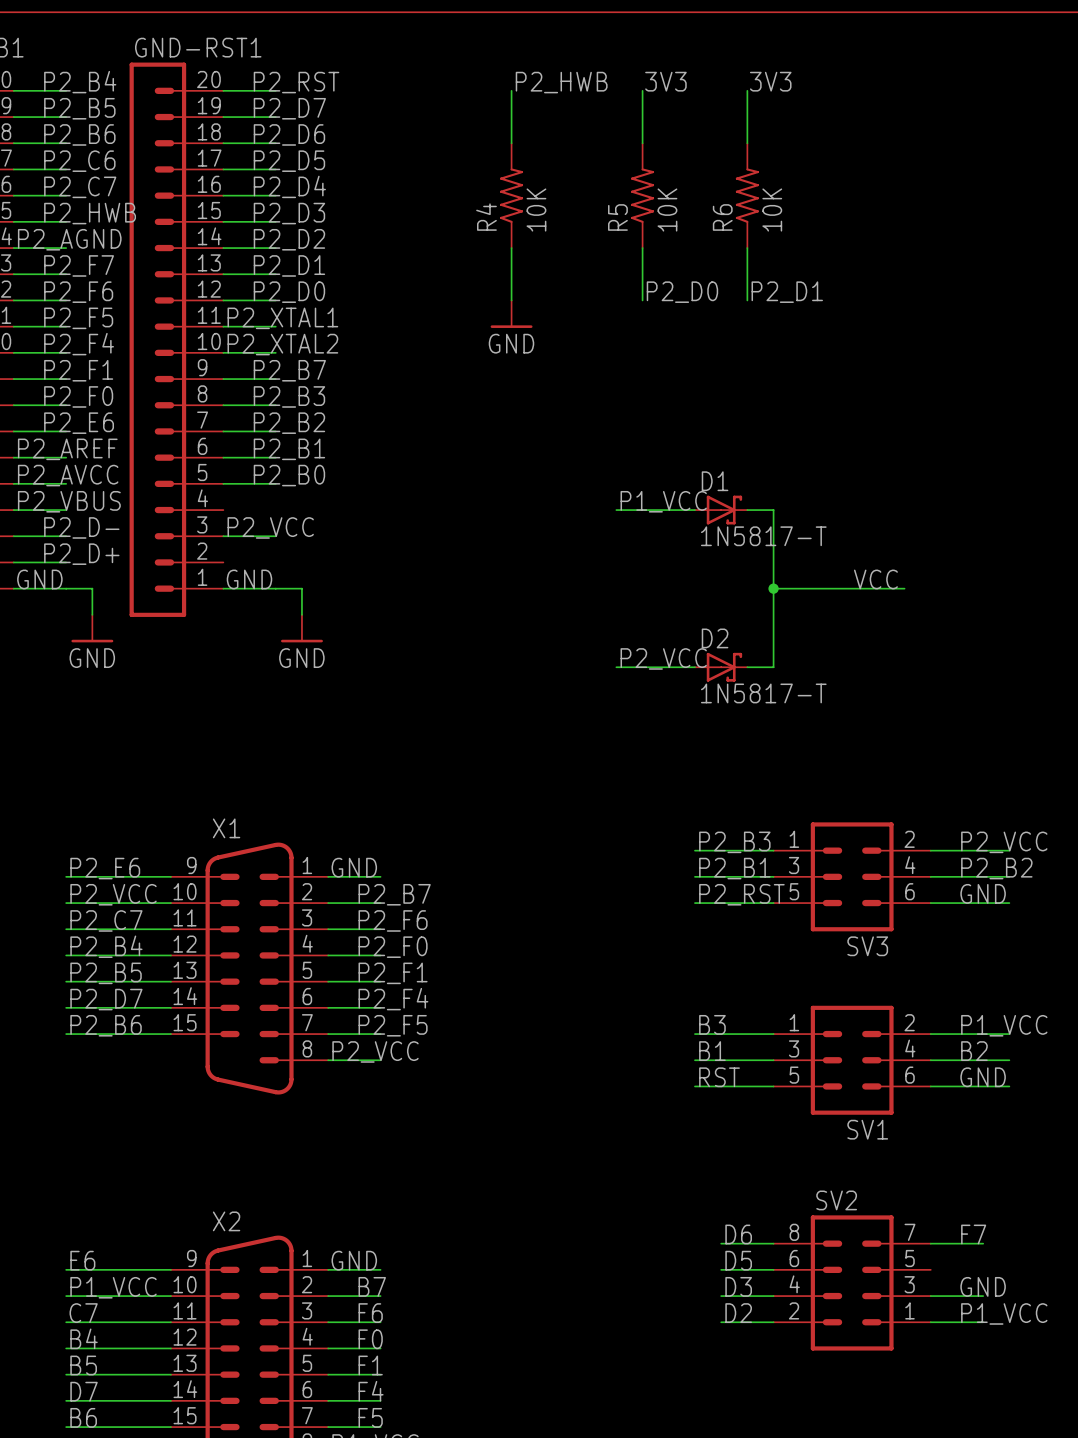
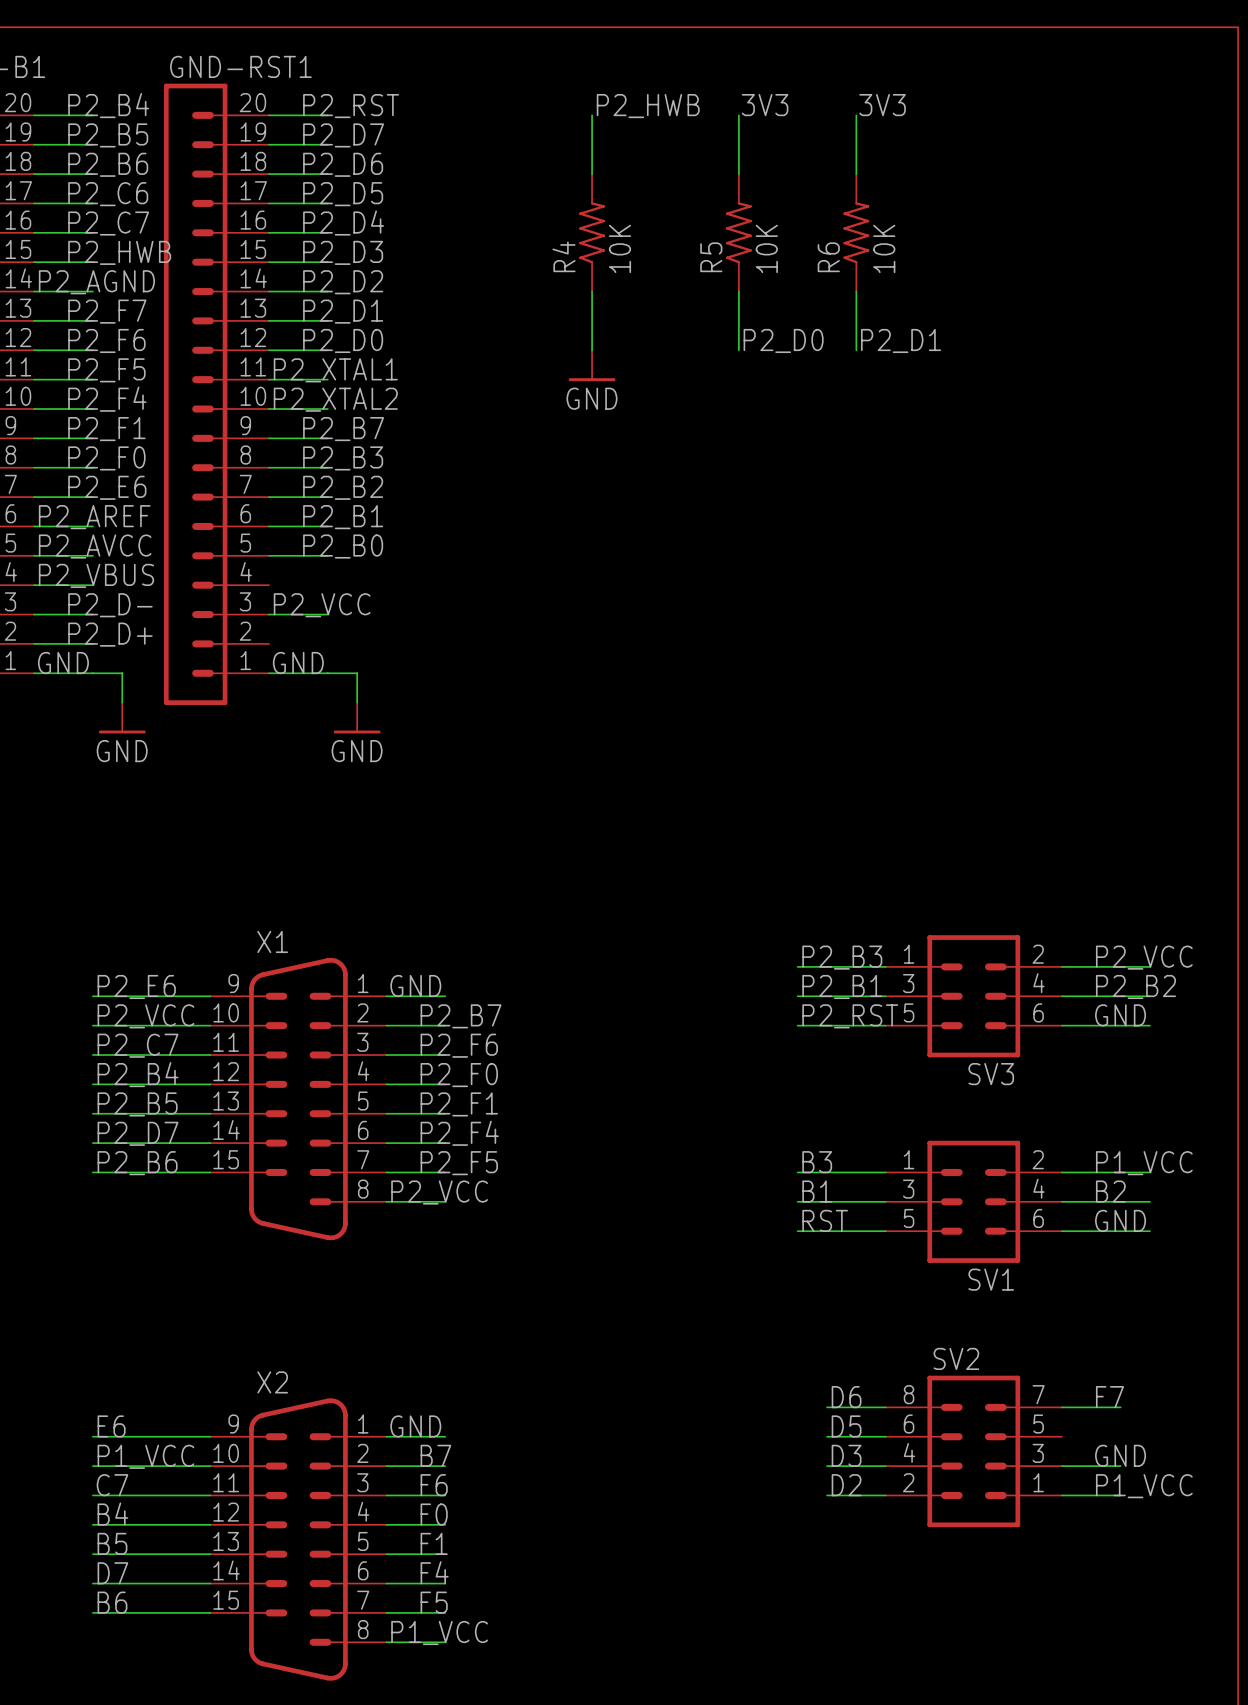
label: P1_VCC (663, 501) -> none
wire: (616, 510) (694, 510) -> none
D1: 1N5817-T (721, 510) -> none
wire: (747, 510) (773, 510) (773, 667) (747, 667) -> none
label: VCC (875, 579) -> none
wire: (773, 588) (904, 588) -> none
junction: (773, 588) -> none
label: P2_VCC (663, 658) -> none
wire: (616, 667) (694, 667) -> none
D2: 1N5817-T (721, 667) -> none

